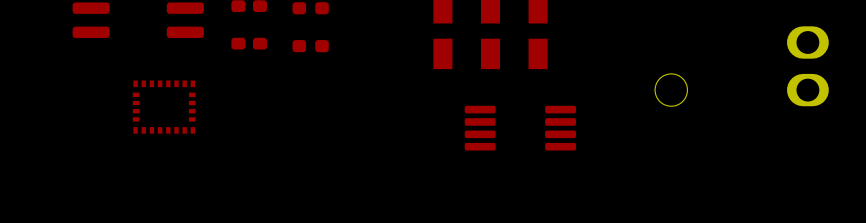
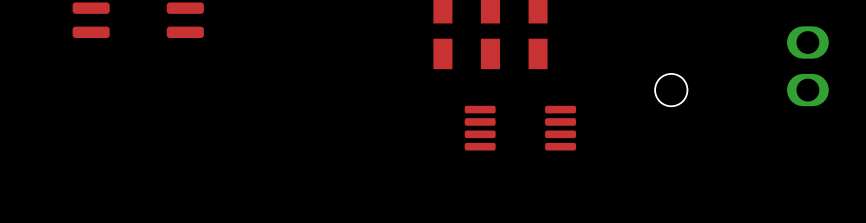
part: (249, 6) -> none
part: (310, 8) -> none
part: (249, 43) -> none
part: (310, 46) -> none
part: (164, 107) -> none

